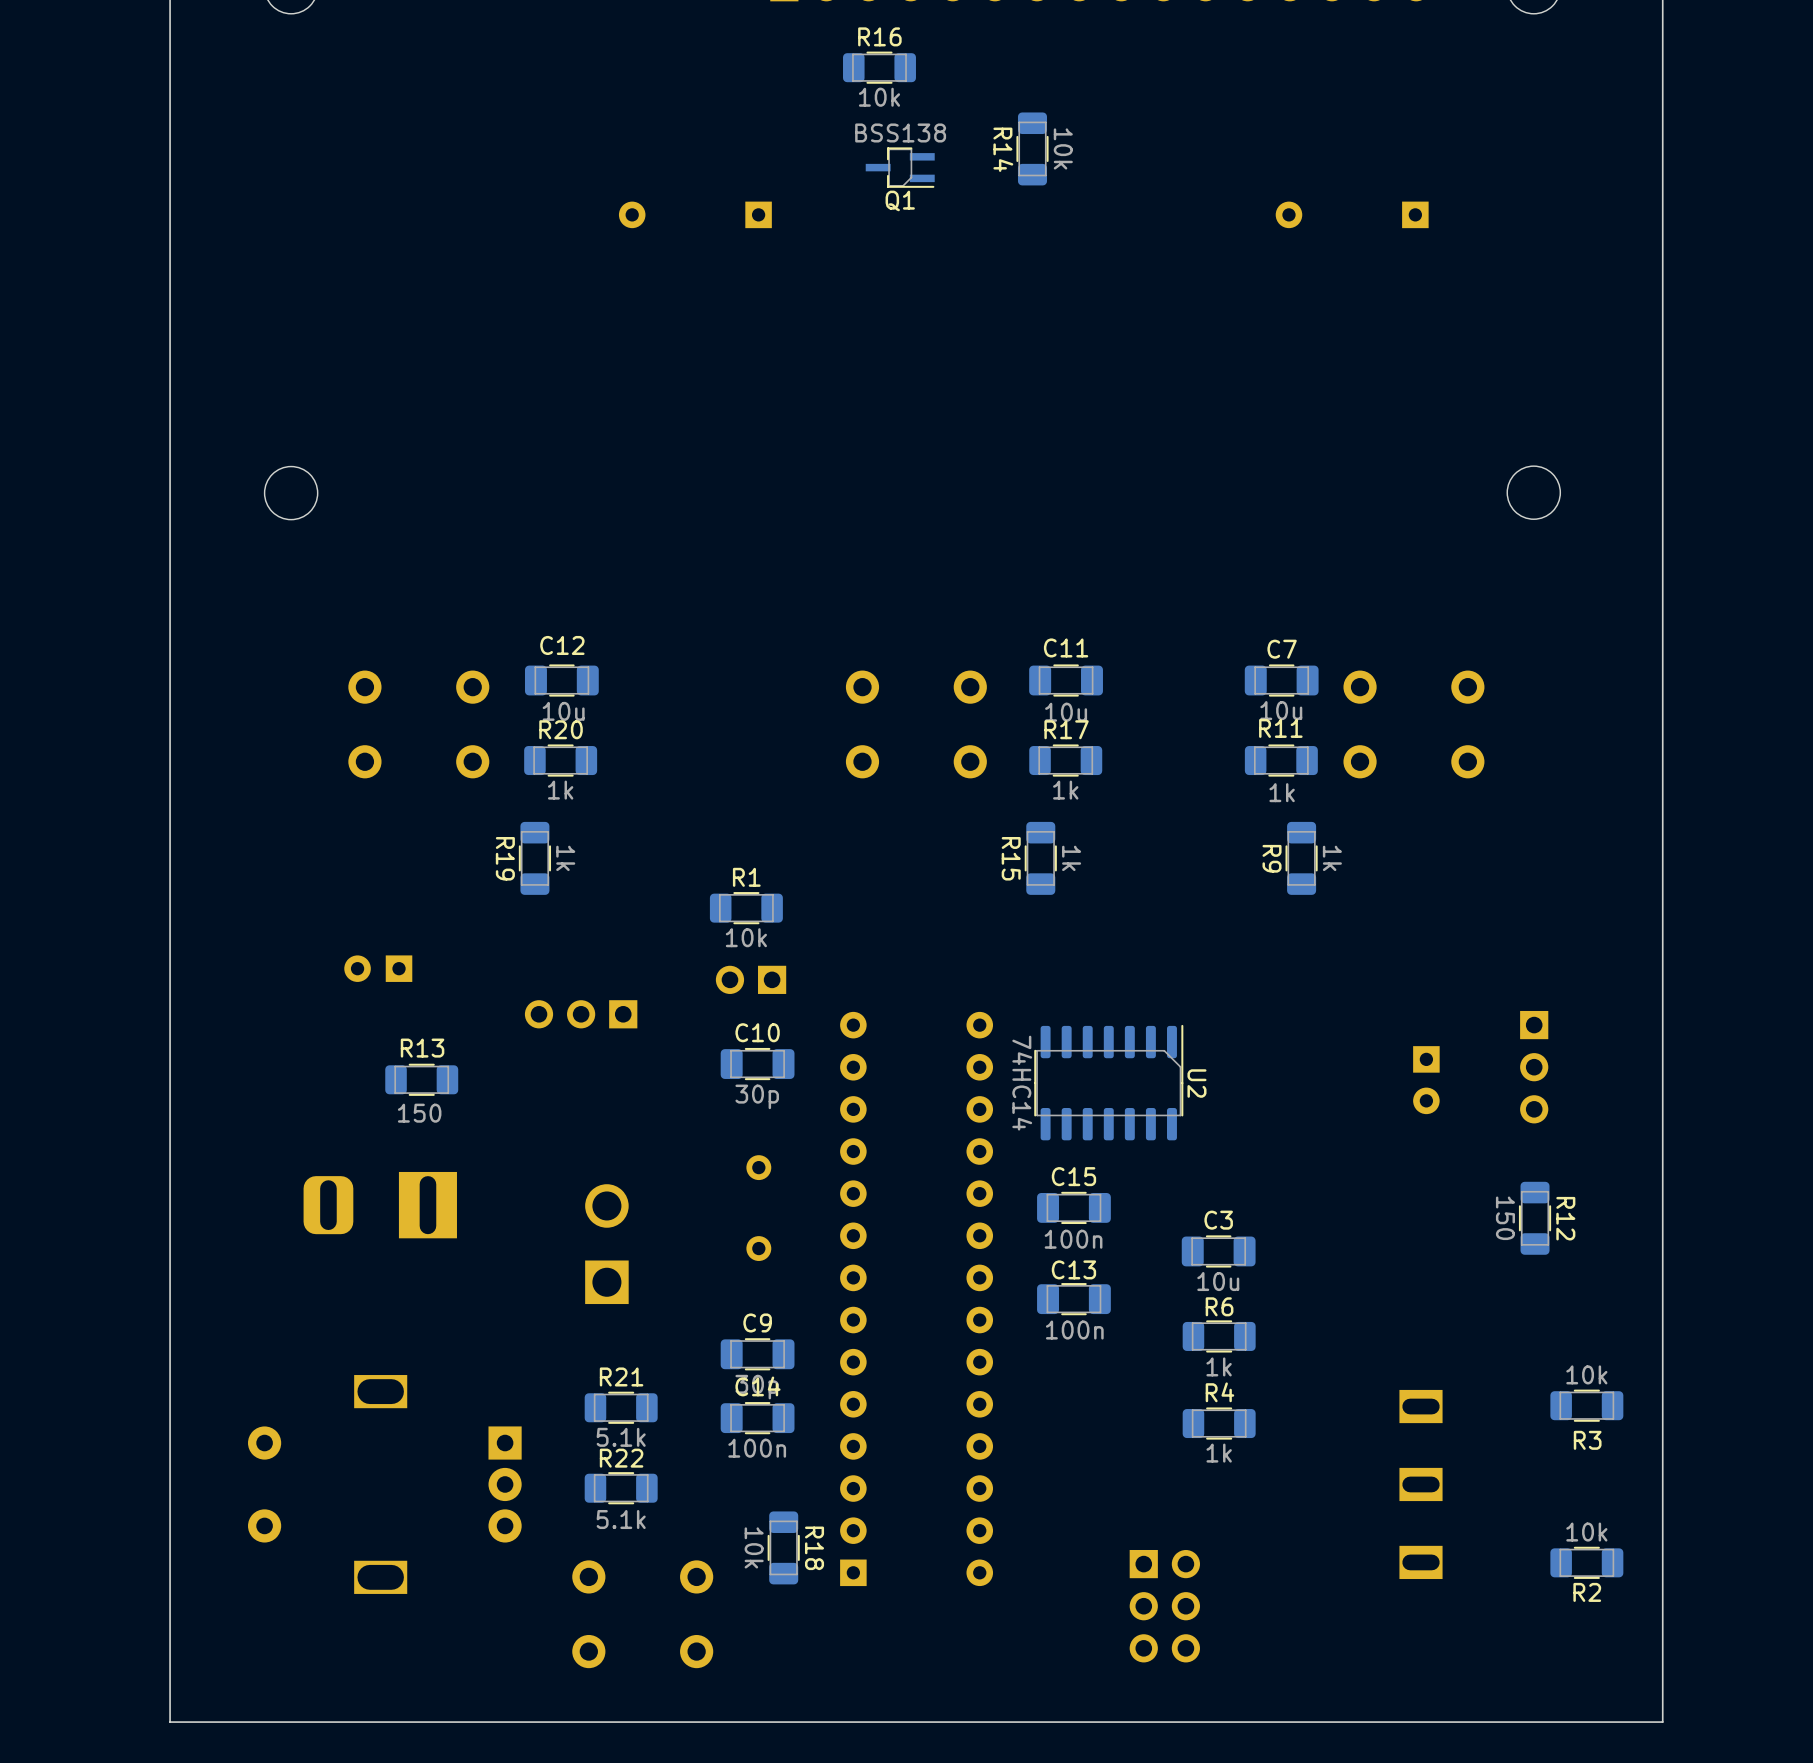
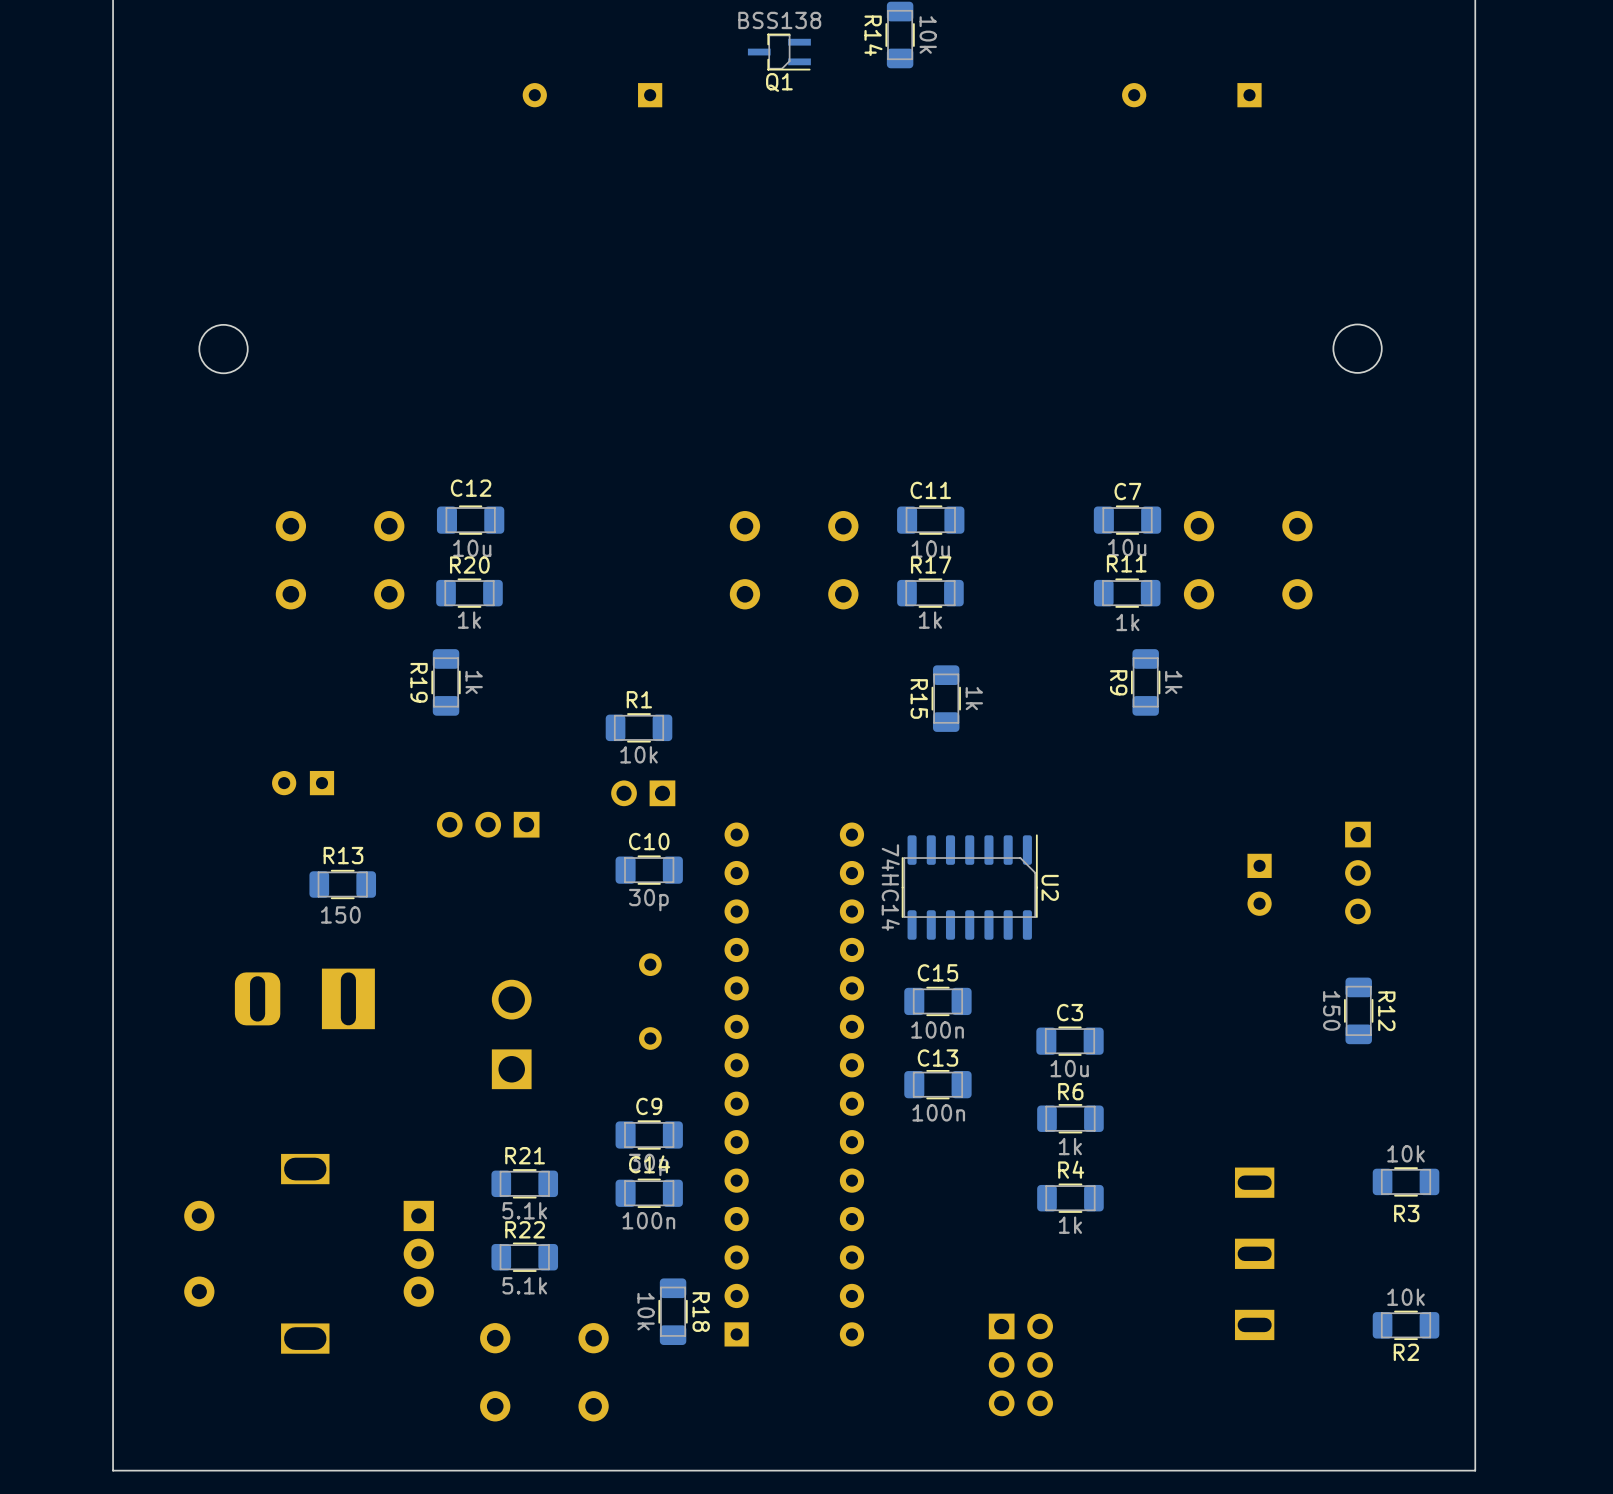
R15 position: (1040, 858) -> (946, 698)

